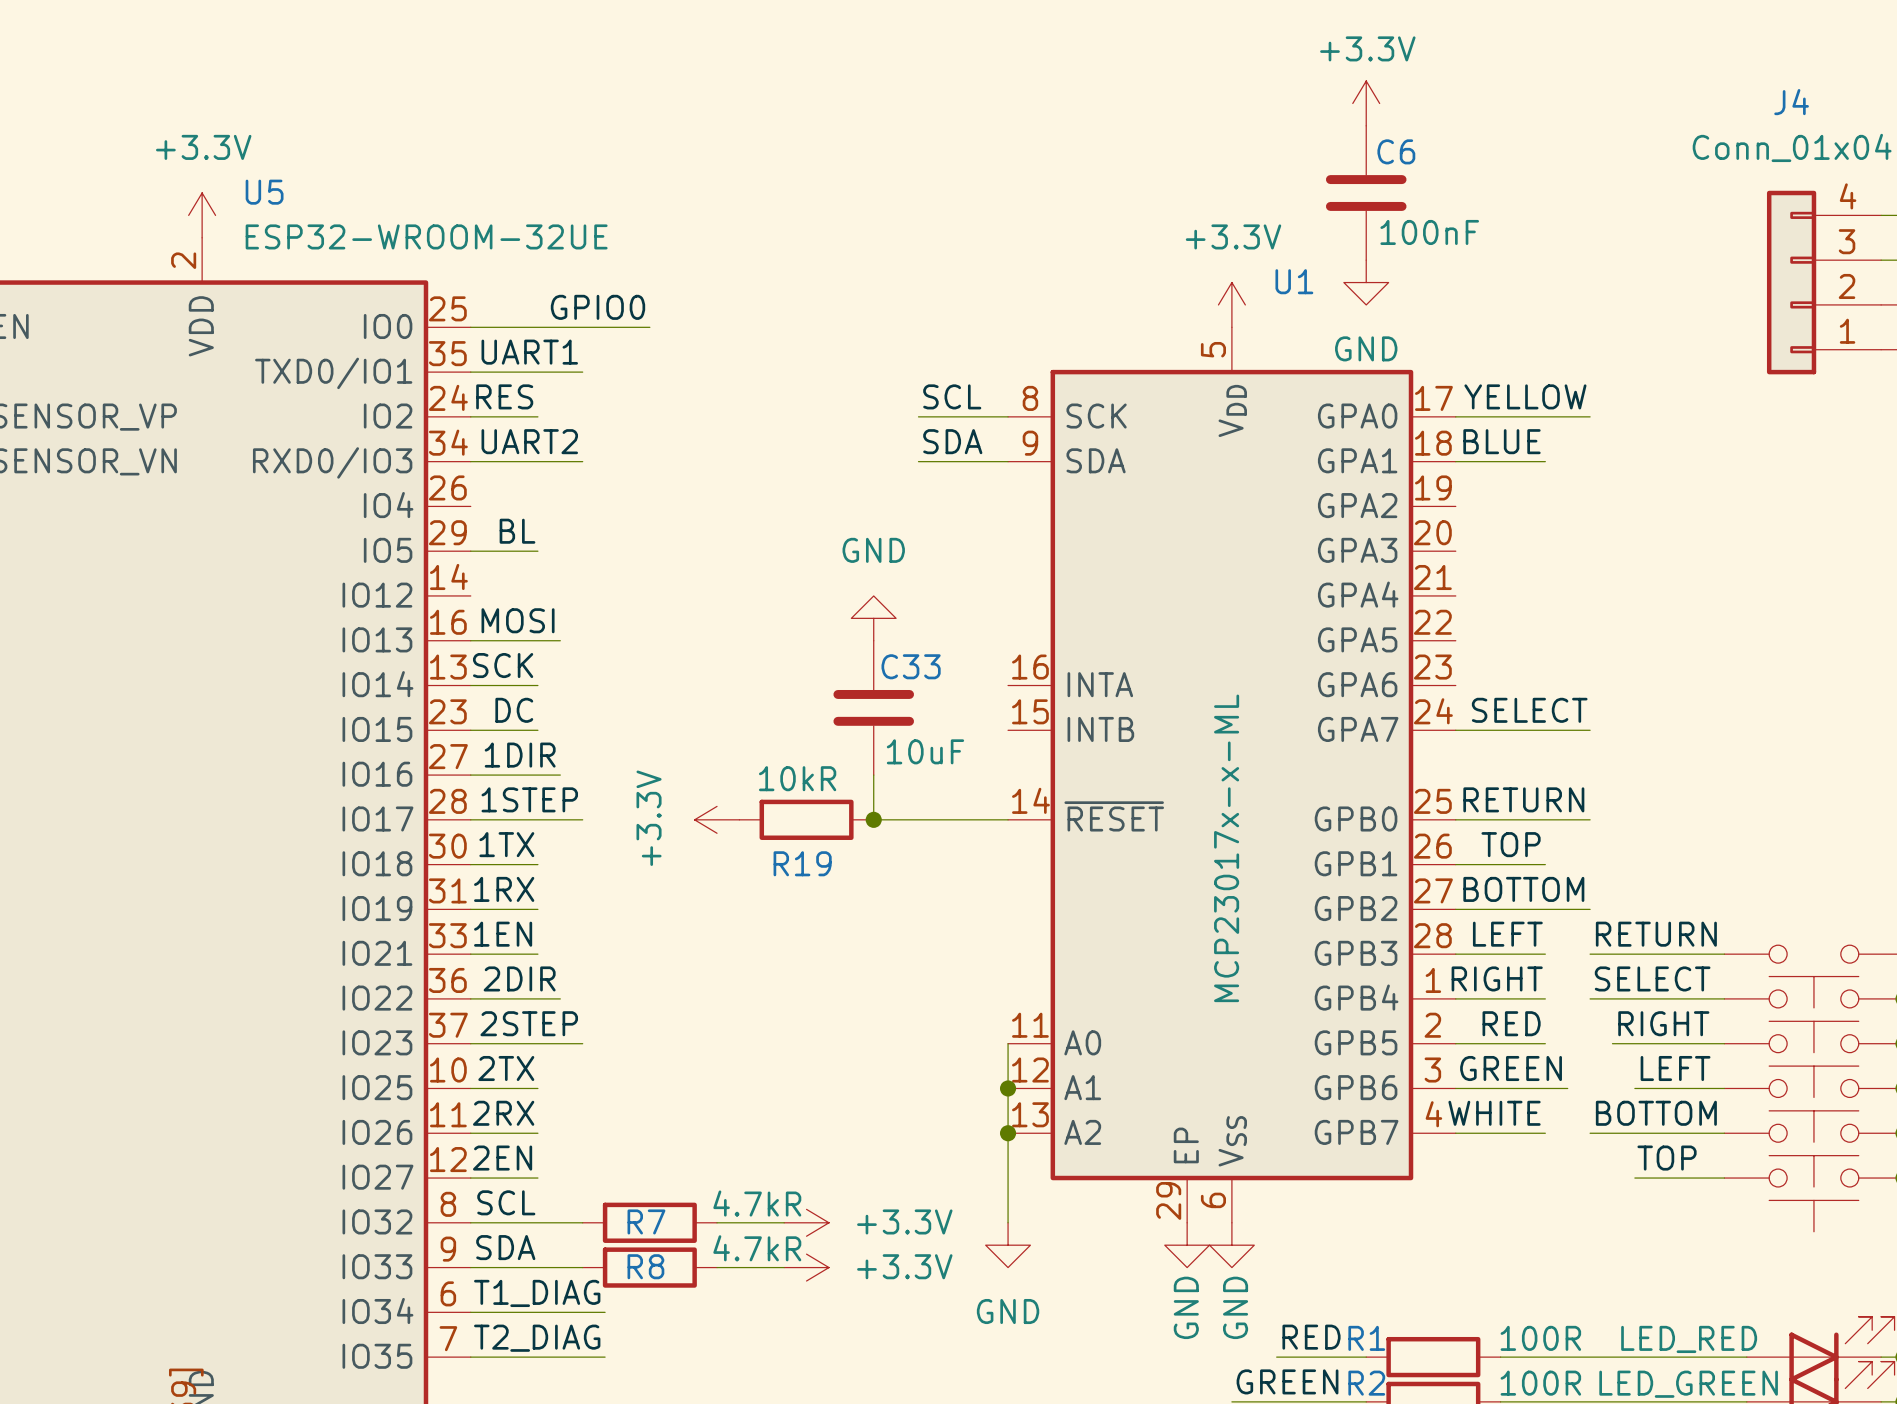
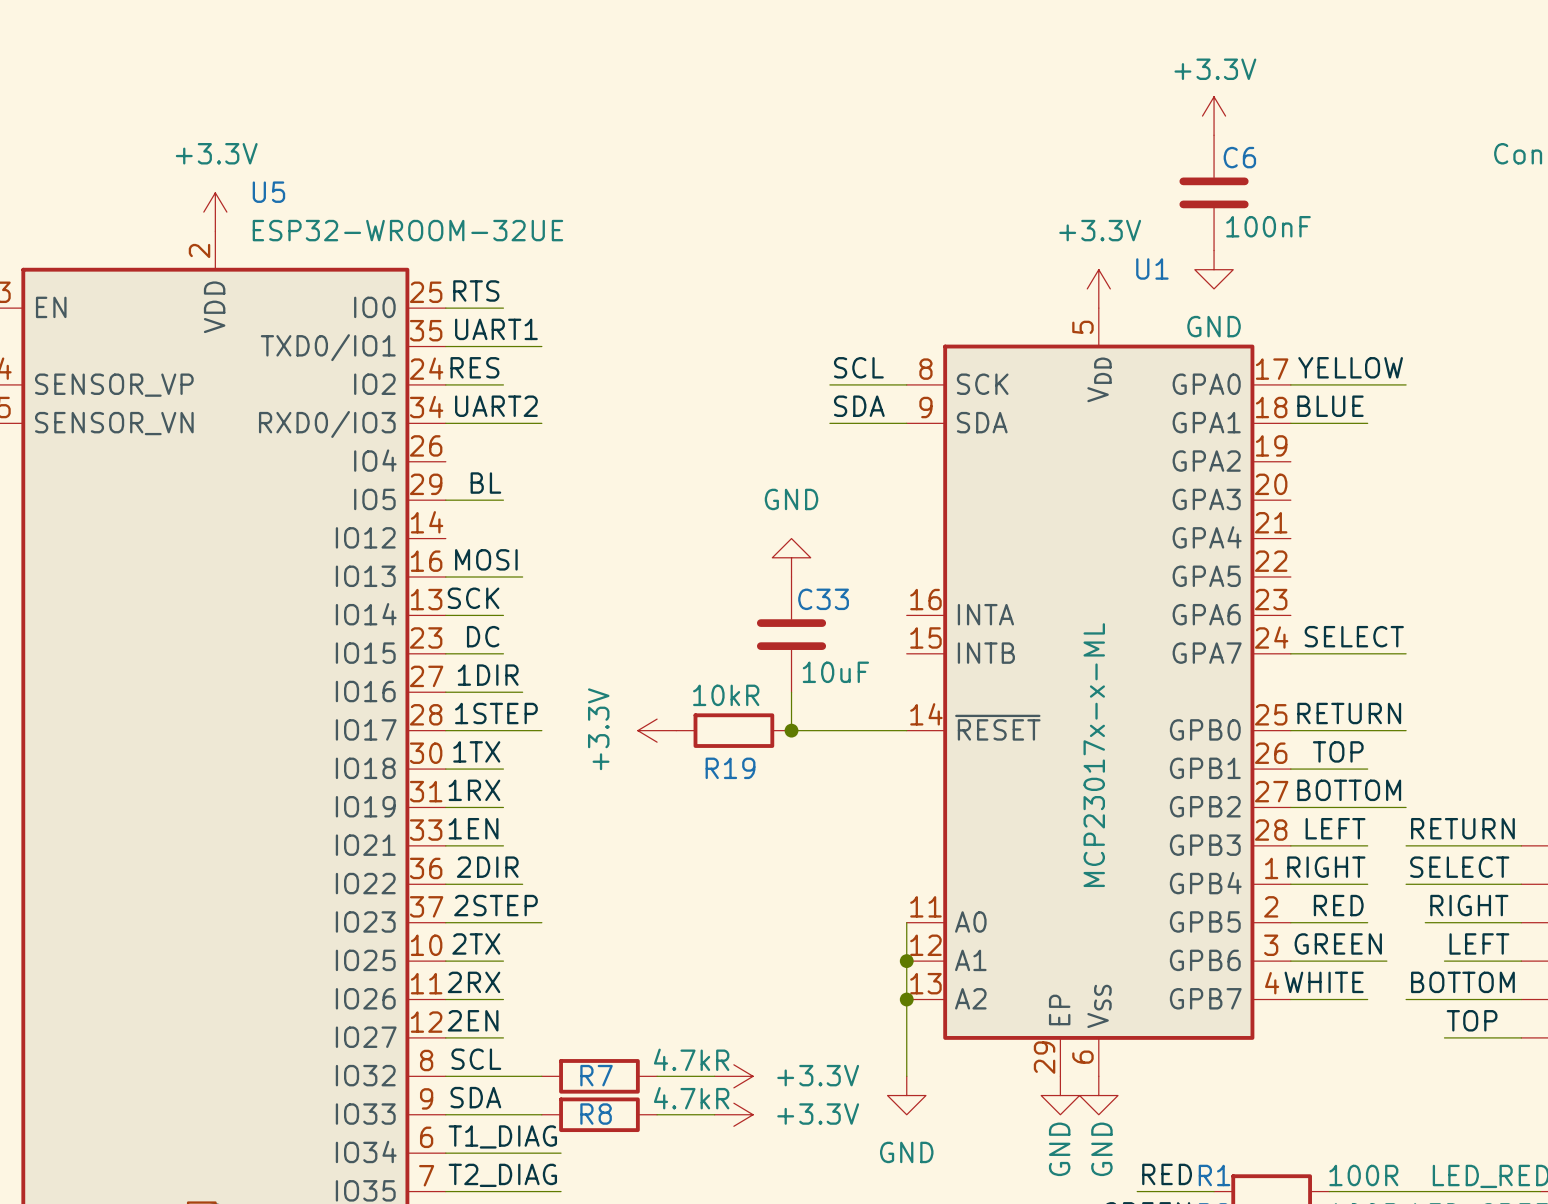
label: none -> RTS (476, 290)
label: GPIO0 (597, 307) -> none
wire: (537, 327) (649, 327) -> none

